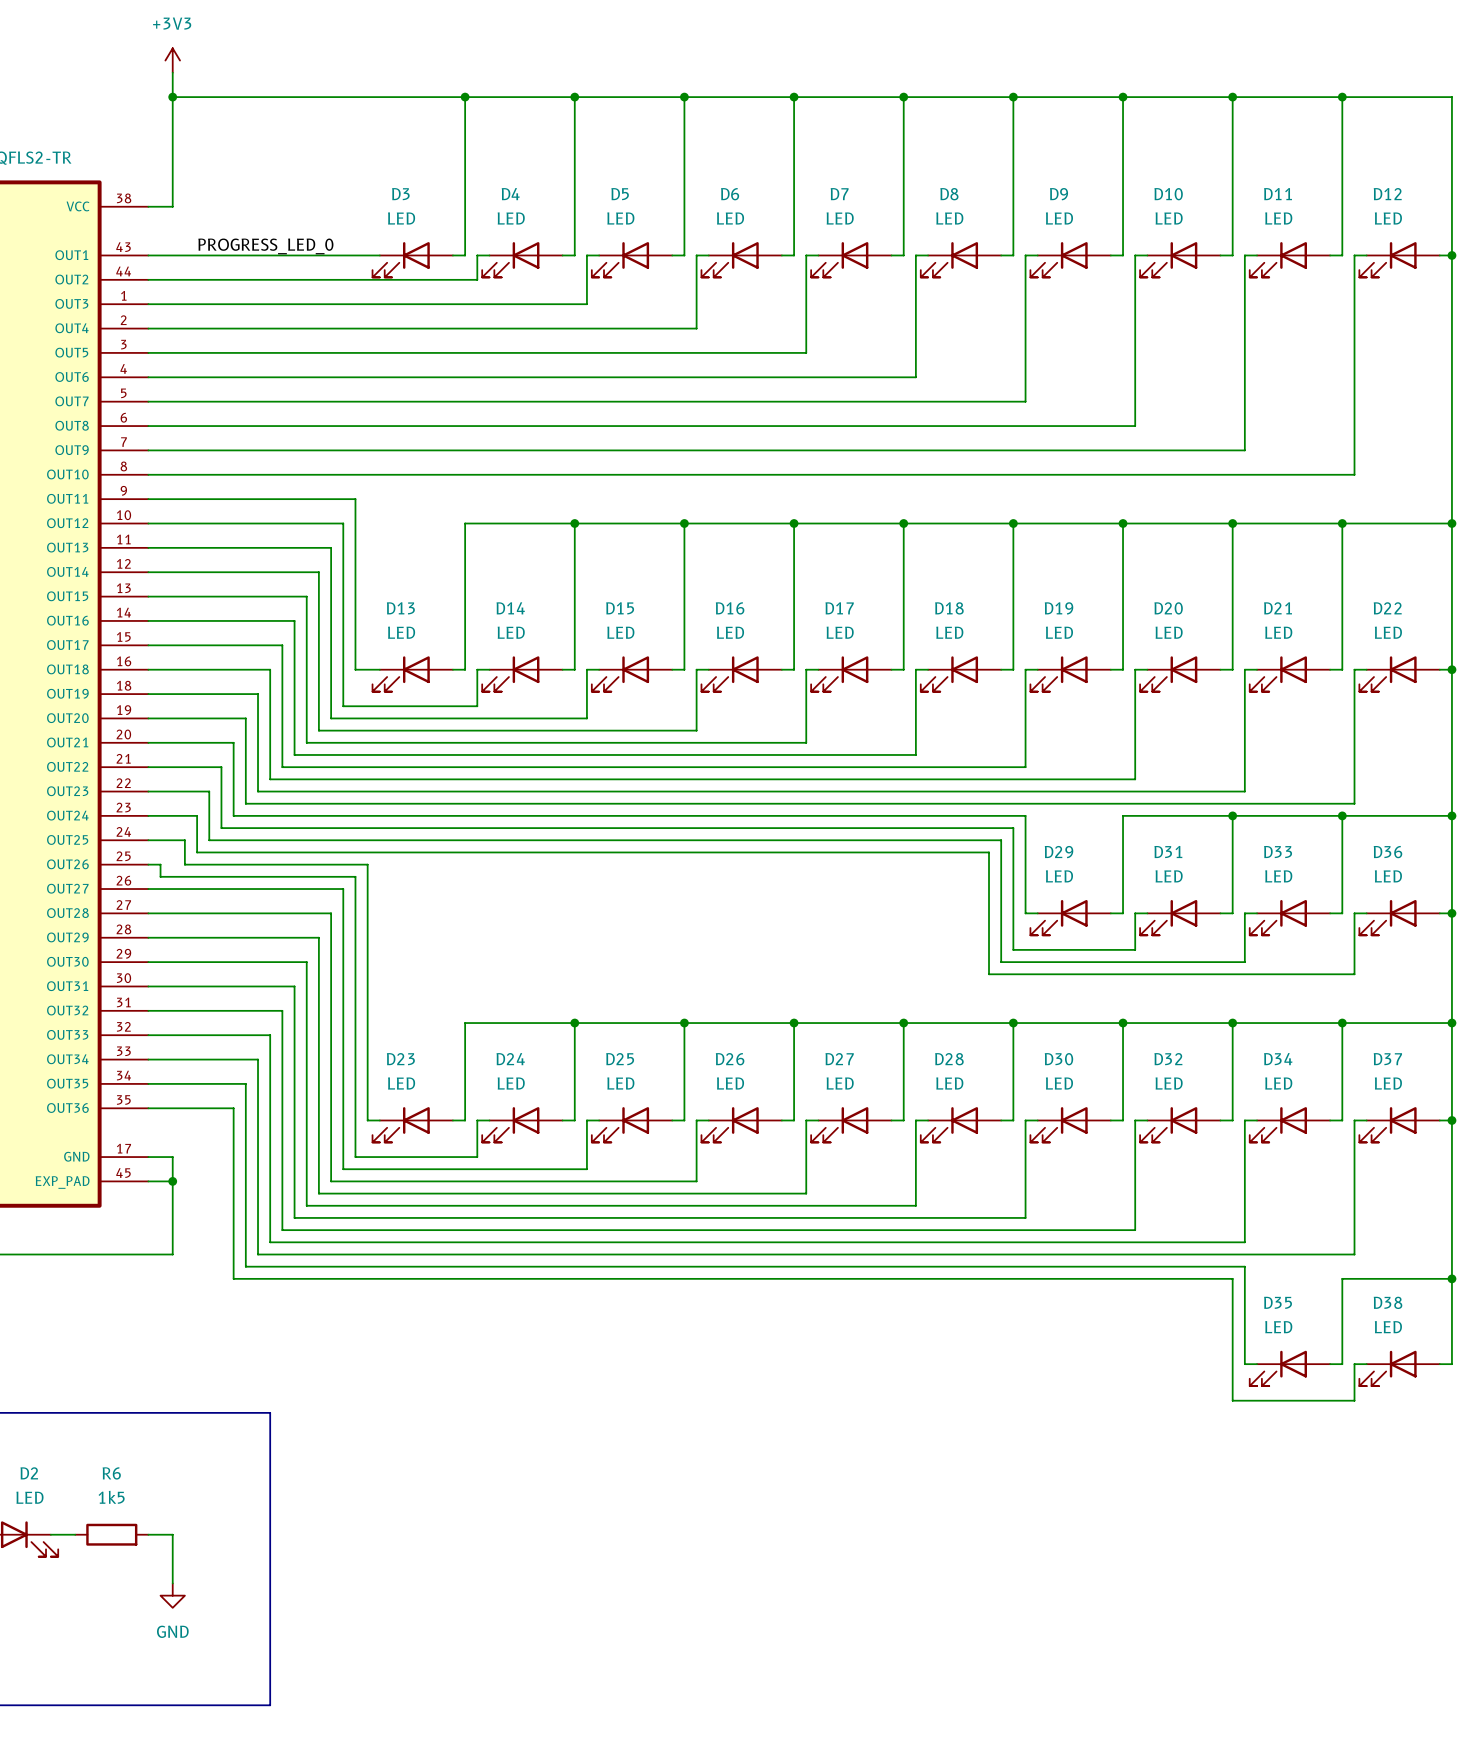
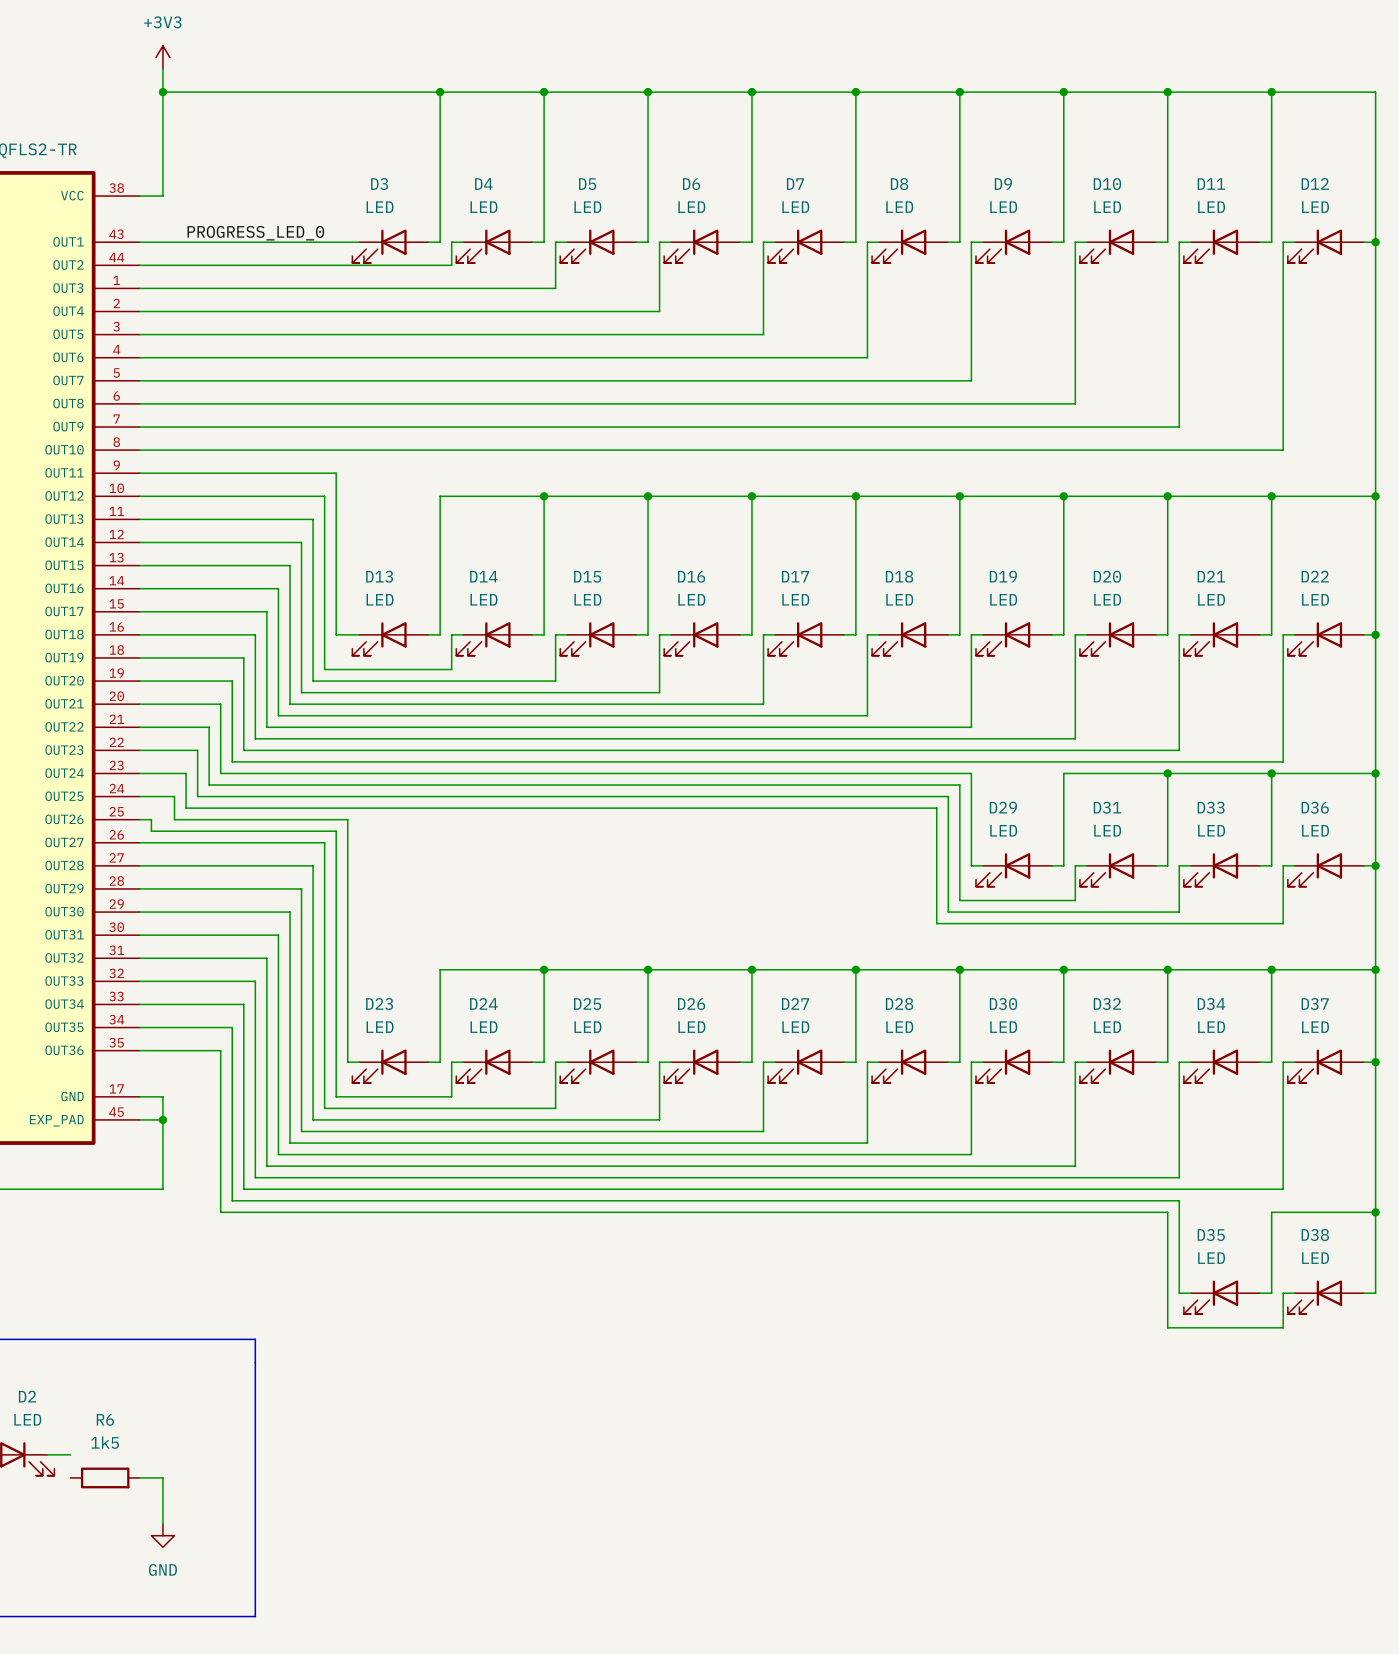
R6 position: (111, 1534) -> (105, 1477)
wire: (148, 1534) (172, 1534) (172, 1559) -> (139, 1477) (162, 1477)
power symbol position: GND (172, 1595) -> GND (162, 1535)

